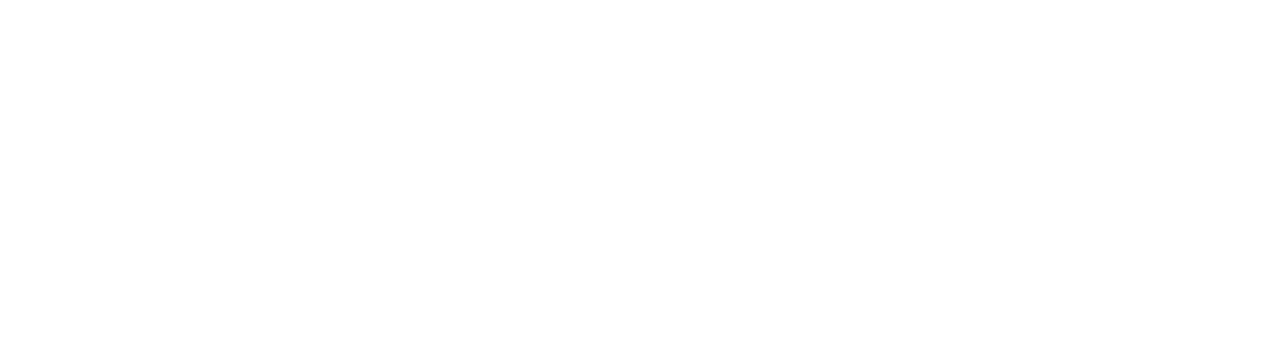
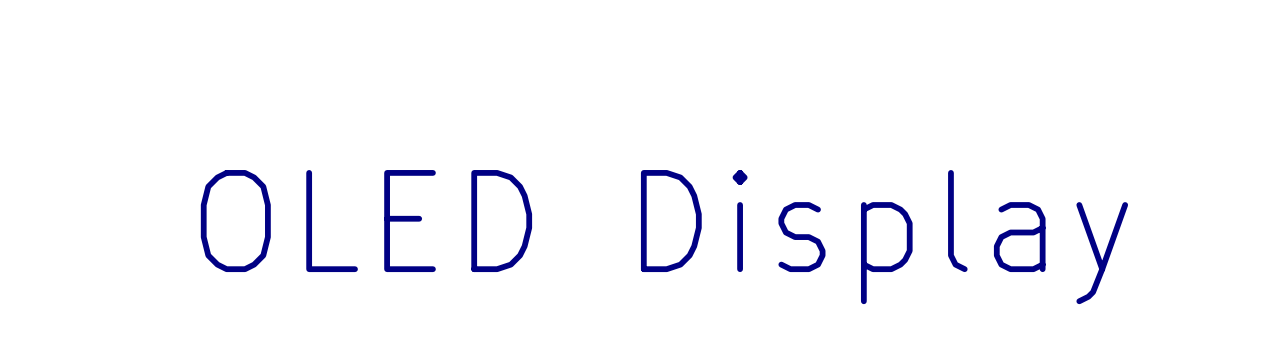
text: none -> OLED Display (664, 237)

